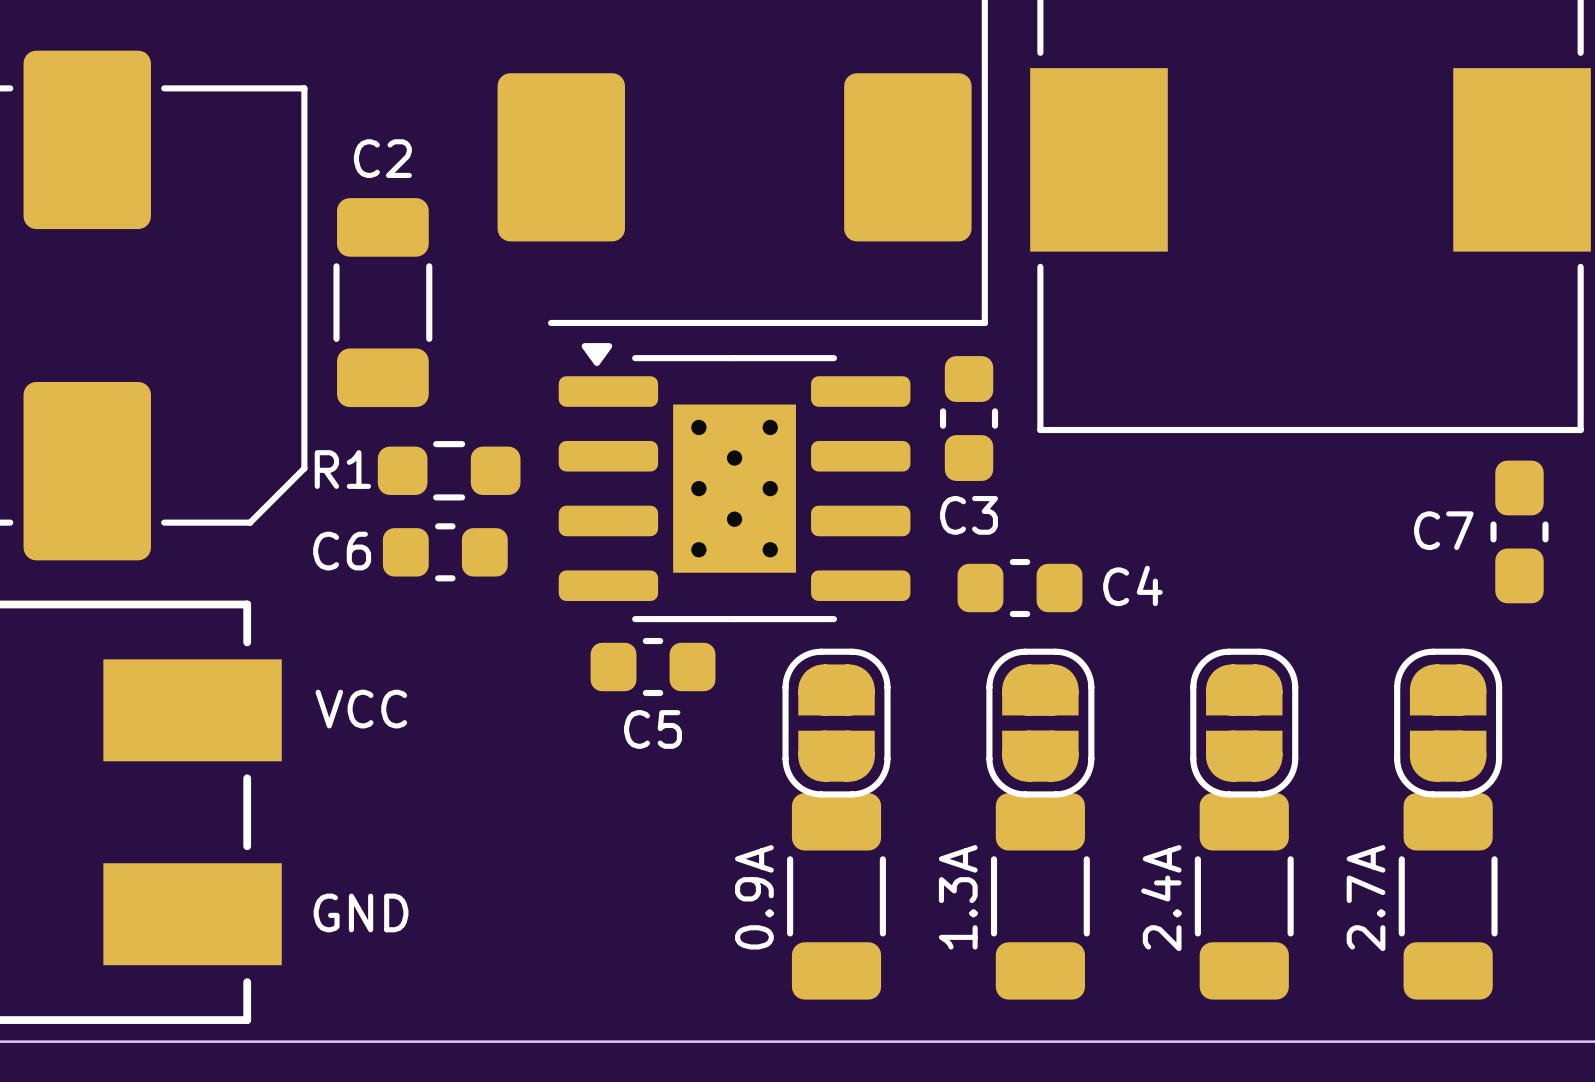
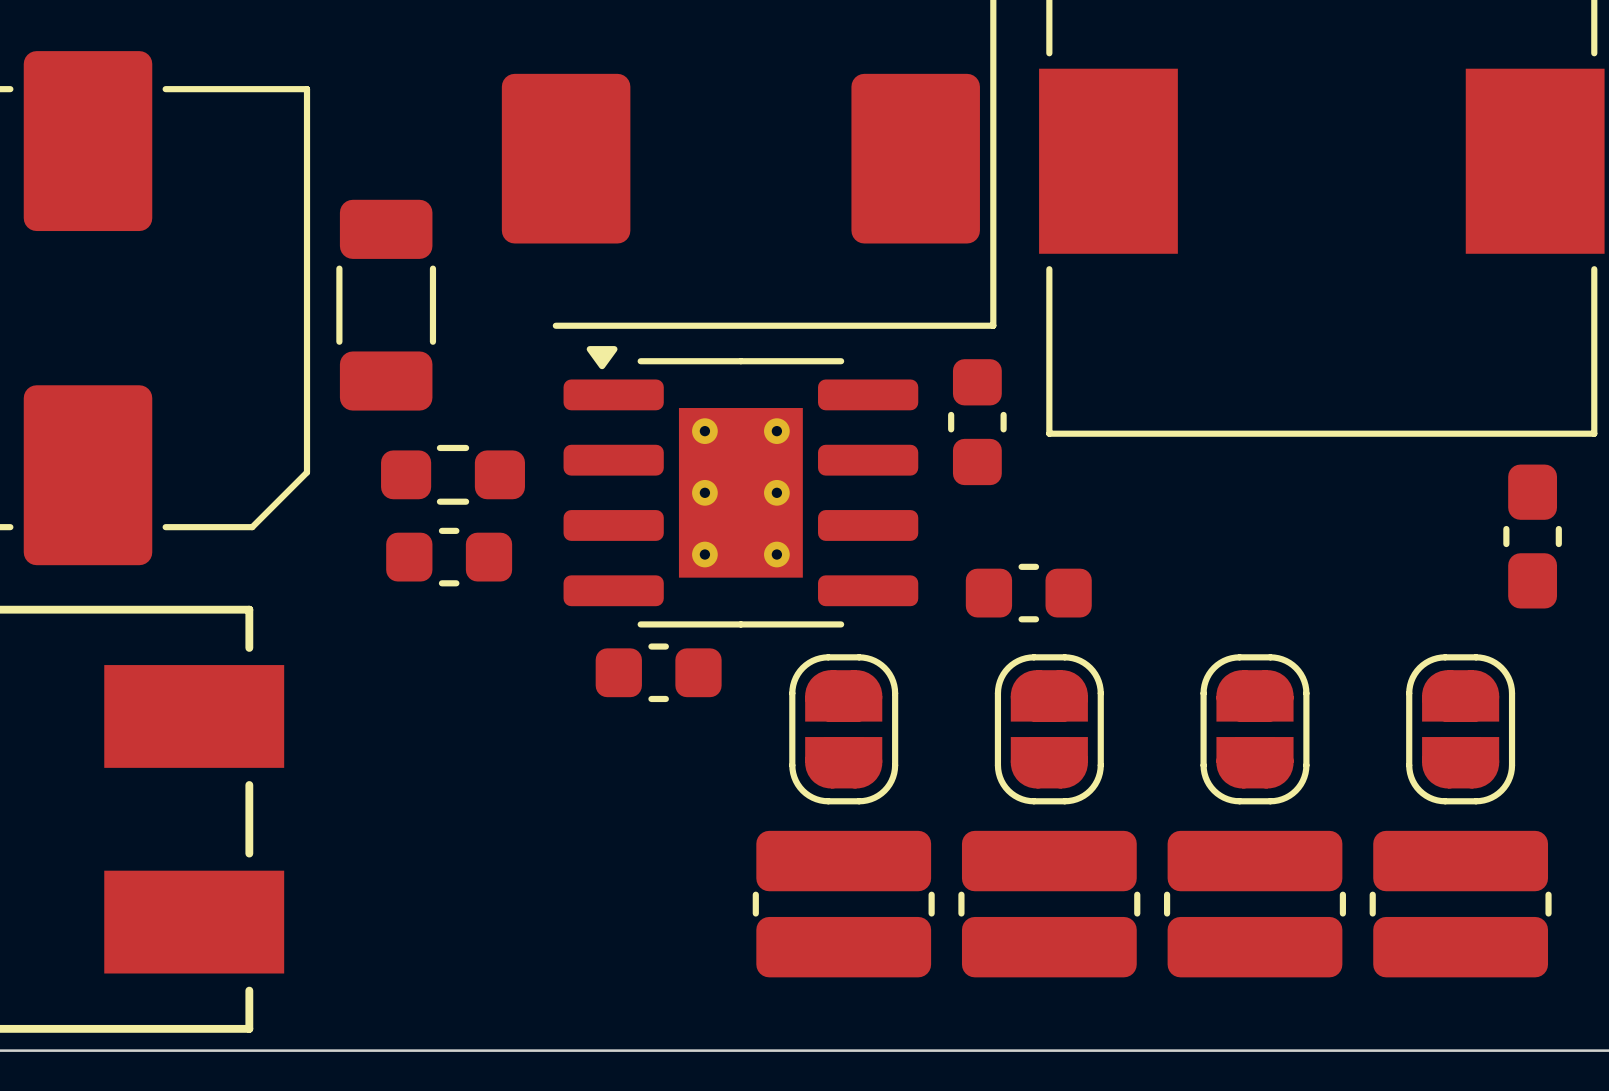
C2 name: C2 (382, 158) -> none
part footprint: [558, 343, 911, 623] -> [563, 346, 919, 628]
R1 name: R1 (342, 469) -> none
C3 name: C3 (969, 515) -> none
C7 name: C7 (1443, 530) -> none
C6 name: C6 (342, 551) -> none
C4 name: C4 (1132, 585) -> none
text: VCC (361, 709) -> none
C5 name: C5 (653, 729) -> none
part footprint: [787, 793, 886, 1000] -> [752, 830, 935, 978]
part footprint: [990, 793, 1090, 1000] -> [958, 830, 1141, 978]
part footprint: [1194, 793, 1294, 1000] -> [1163, 830, 1346, 978]
part footprint: [1398, 793, 1498, 1000] -> [1369, 830, 1552, 978]
text: 0.9A (754, 897) -> none
text: 1.3A (958, 897) -> none
text: 2.4A (1161, 898) -> none
text: 2.7A (1366, 898) -> none
text: GND (361, 912) -> none

